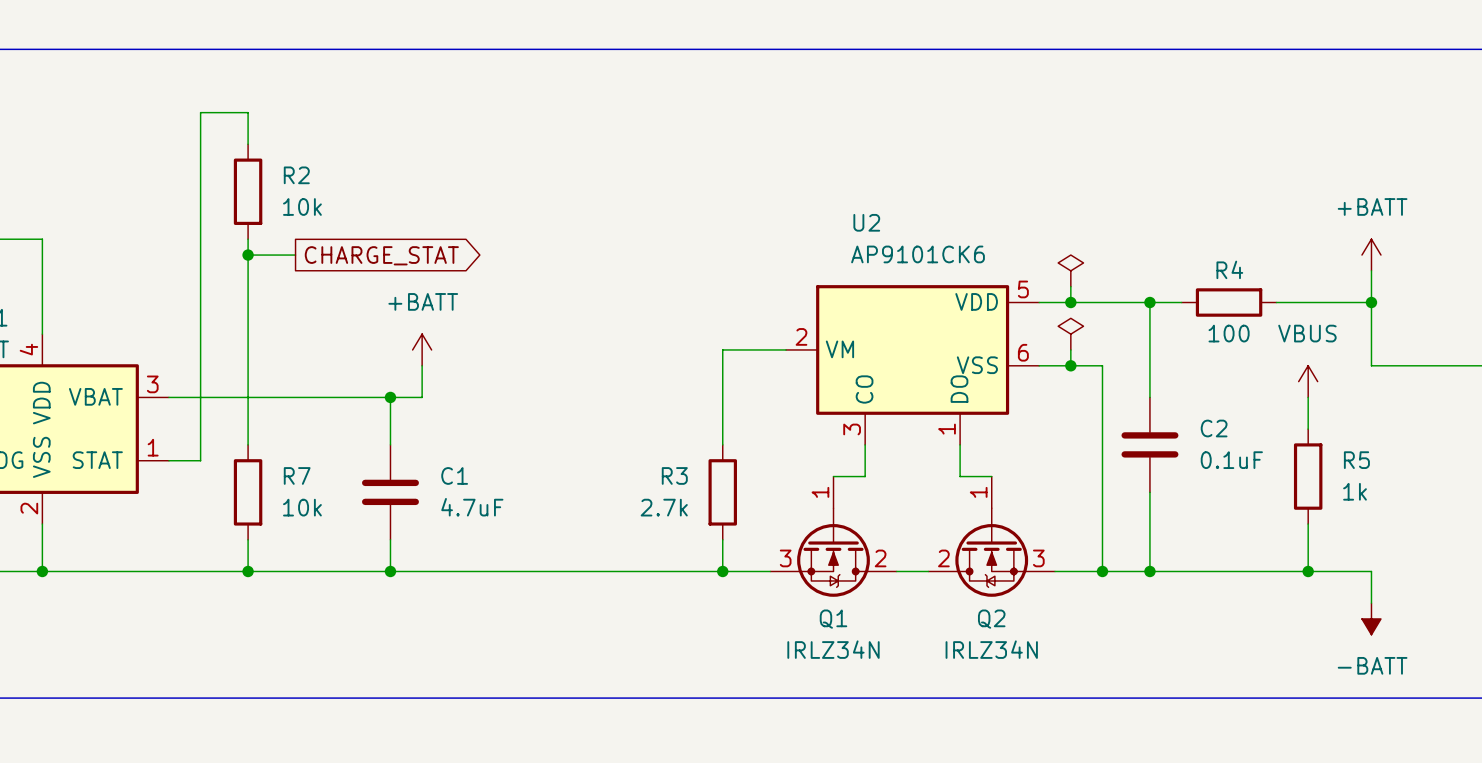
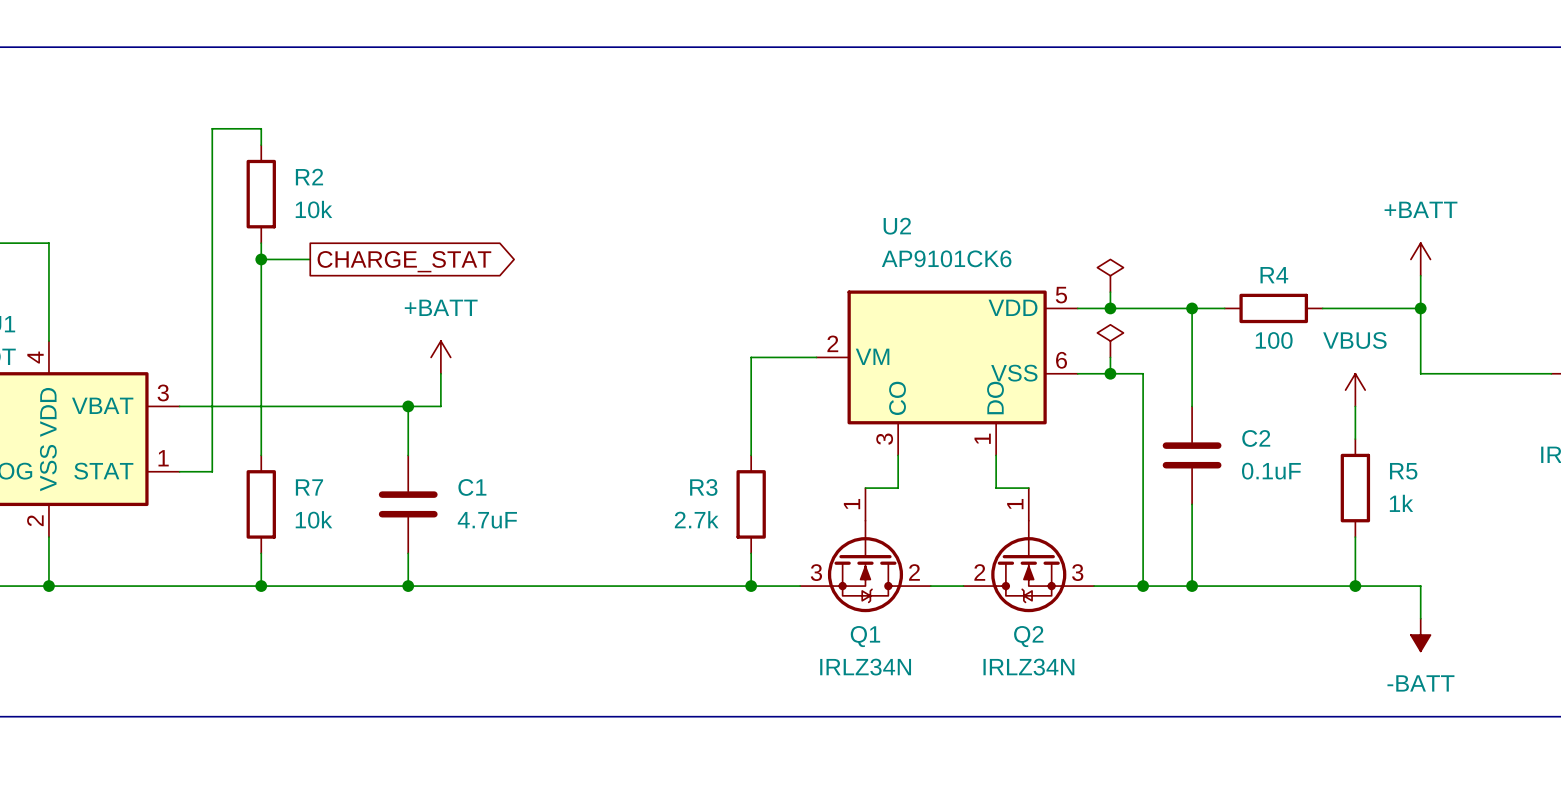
wire: (200, 128) (200, 112) (248, 112) (248, 128) -> (212, 128) (261, 128)

